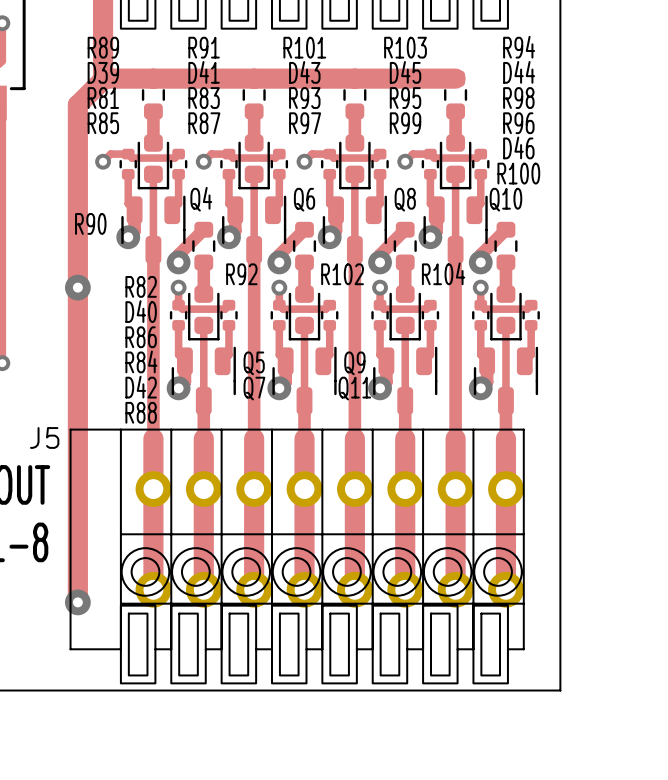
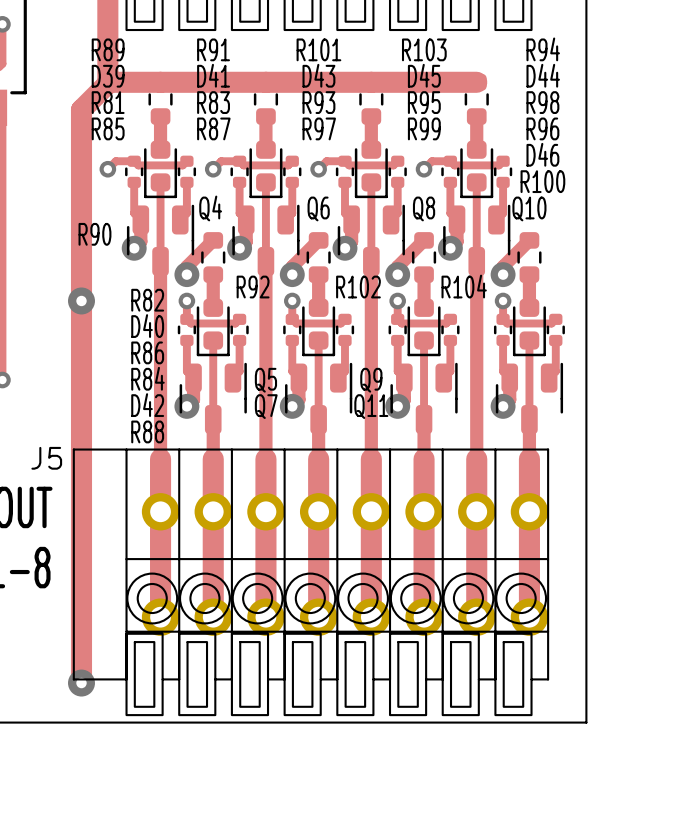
track: none -> (81, 630) (81, 683)
via position: (77, 602) -> (81, 683)

